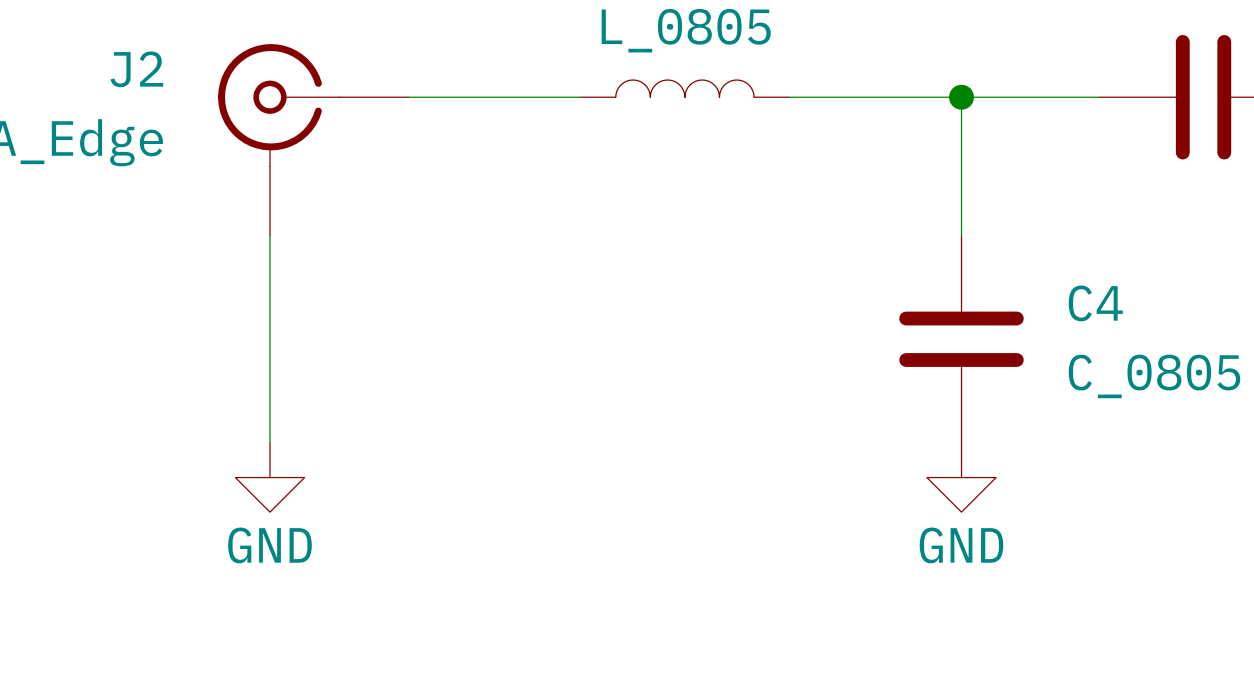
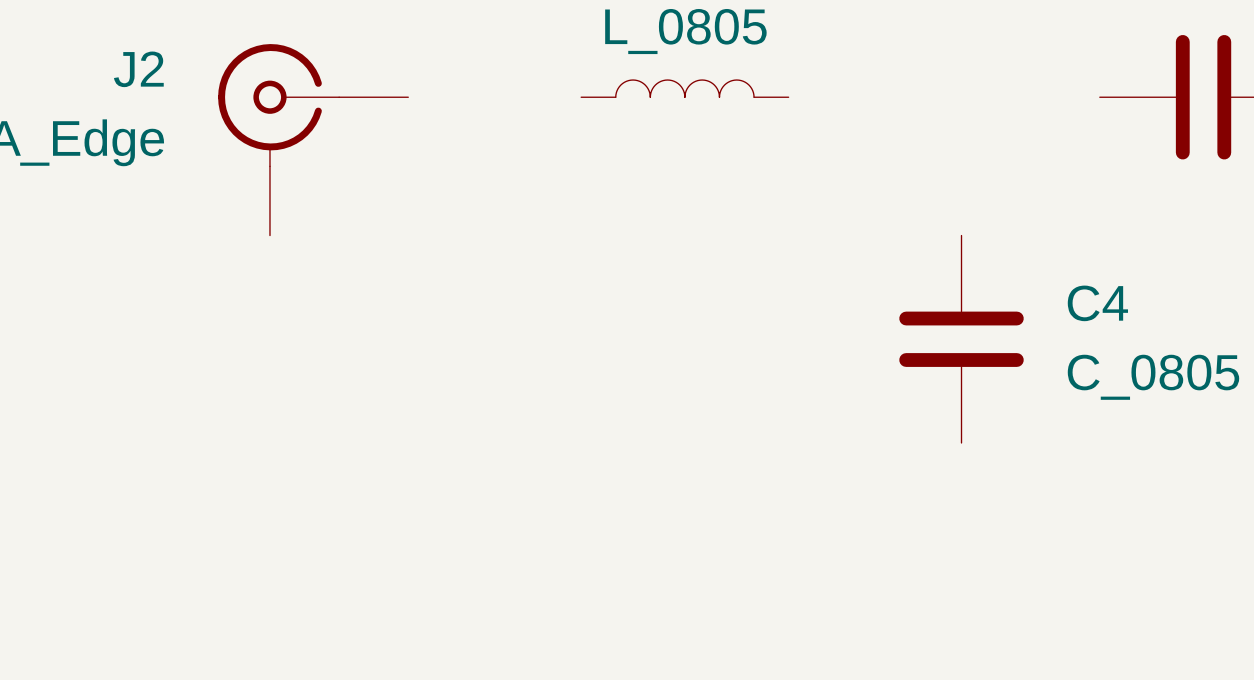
wire: (408, 97) (581, 97) -> none
wire: (788, 97) (1099, 97) -> none
wire: (961, 97) (961, 235) -> none
junction: (961, 97) -> none
wire: (269, 235) (269, 442) -> none
power symbol: GND (269, 477) -> none
power symbol: GND (961, 477) -> none

